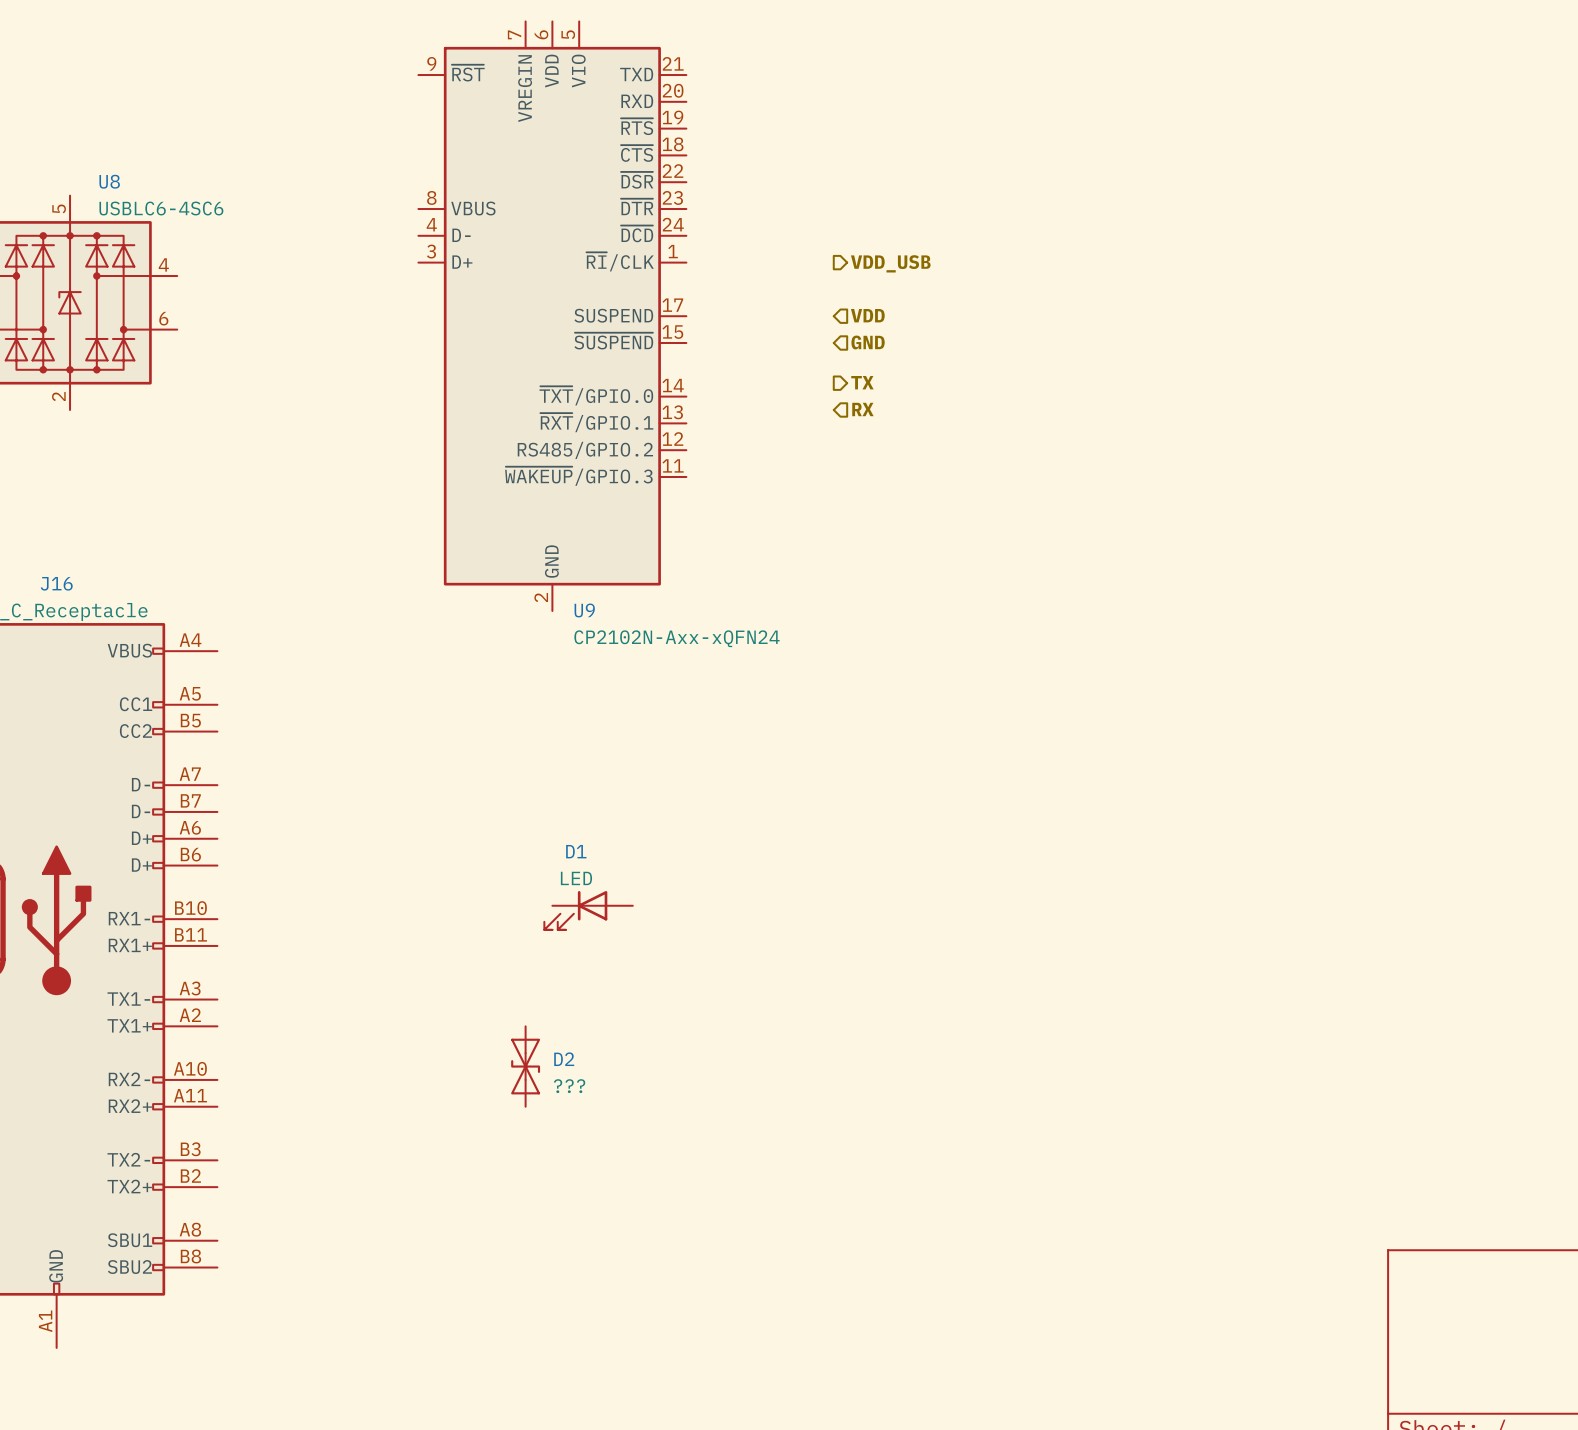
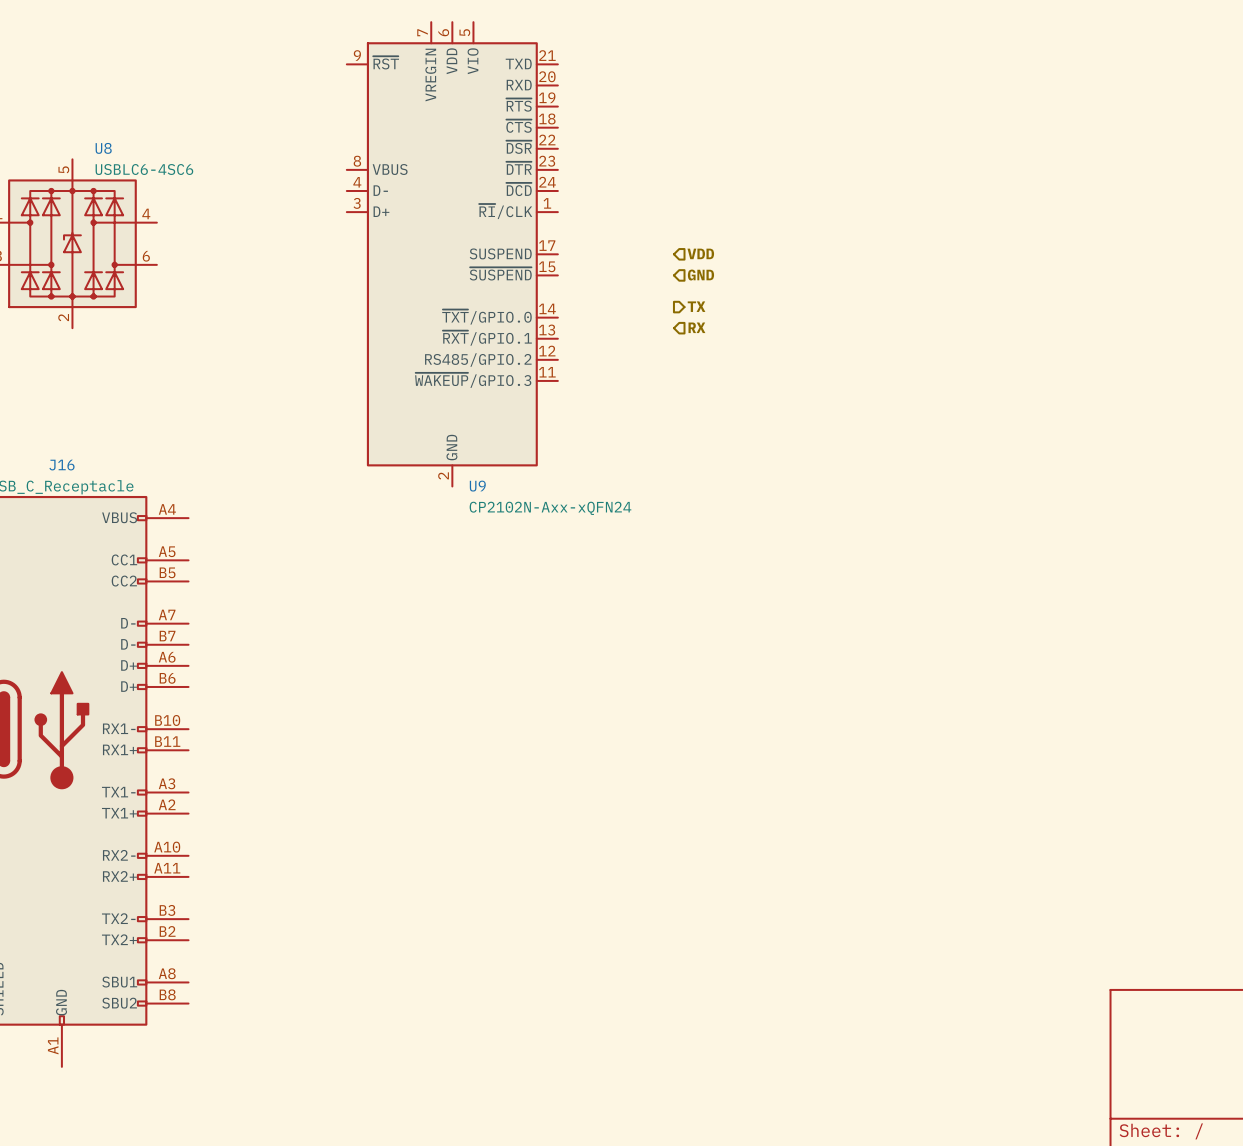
hierarchical label: VDD_USB (890, 263) -> none
D1: LED (588, 910) -> none
D2: ??? (525, 1066) -> none

